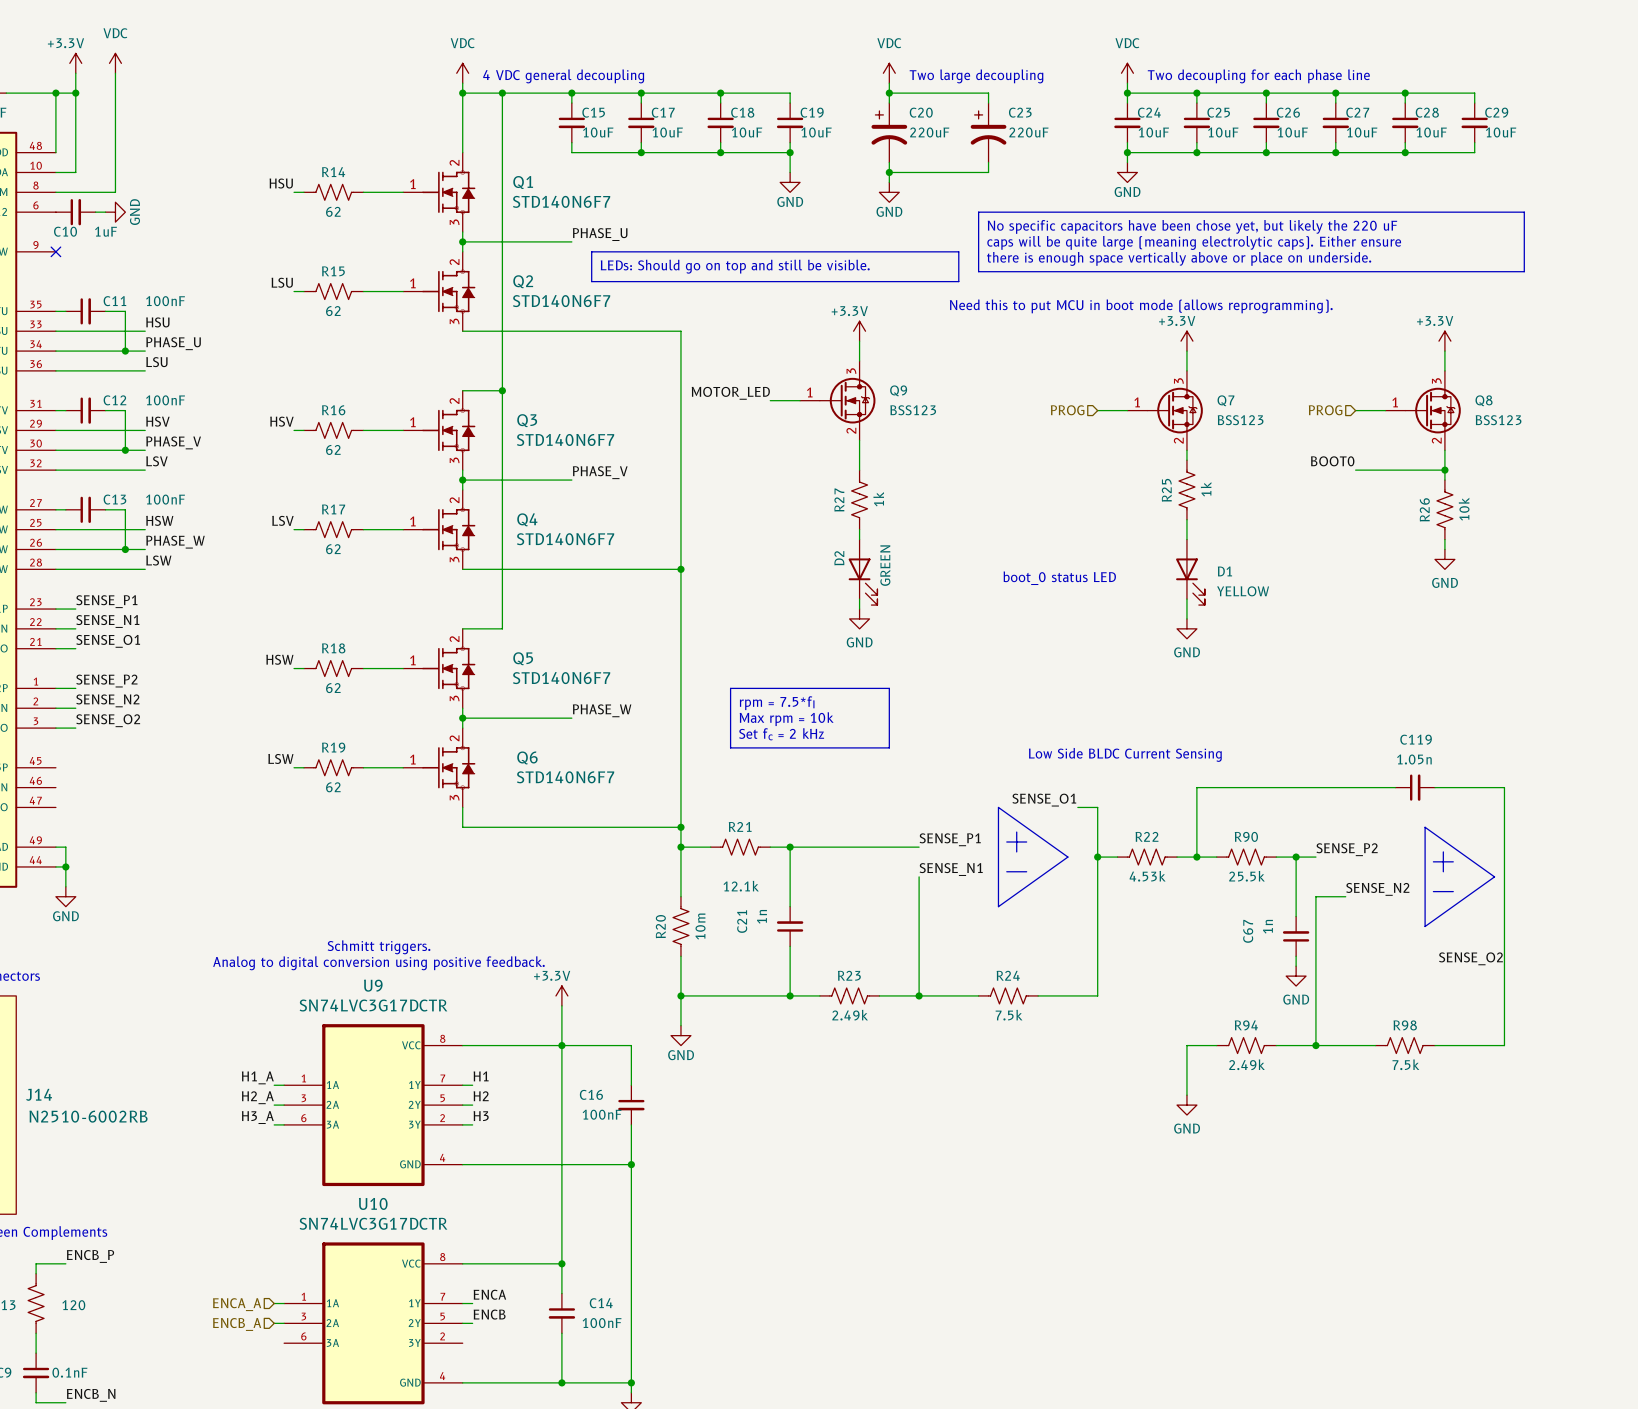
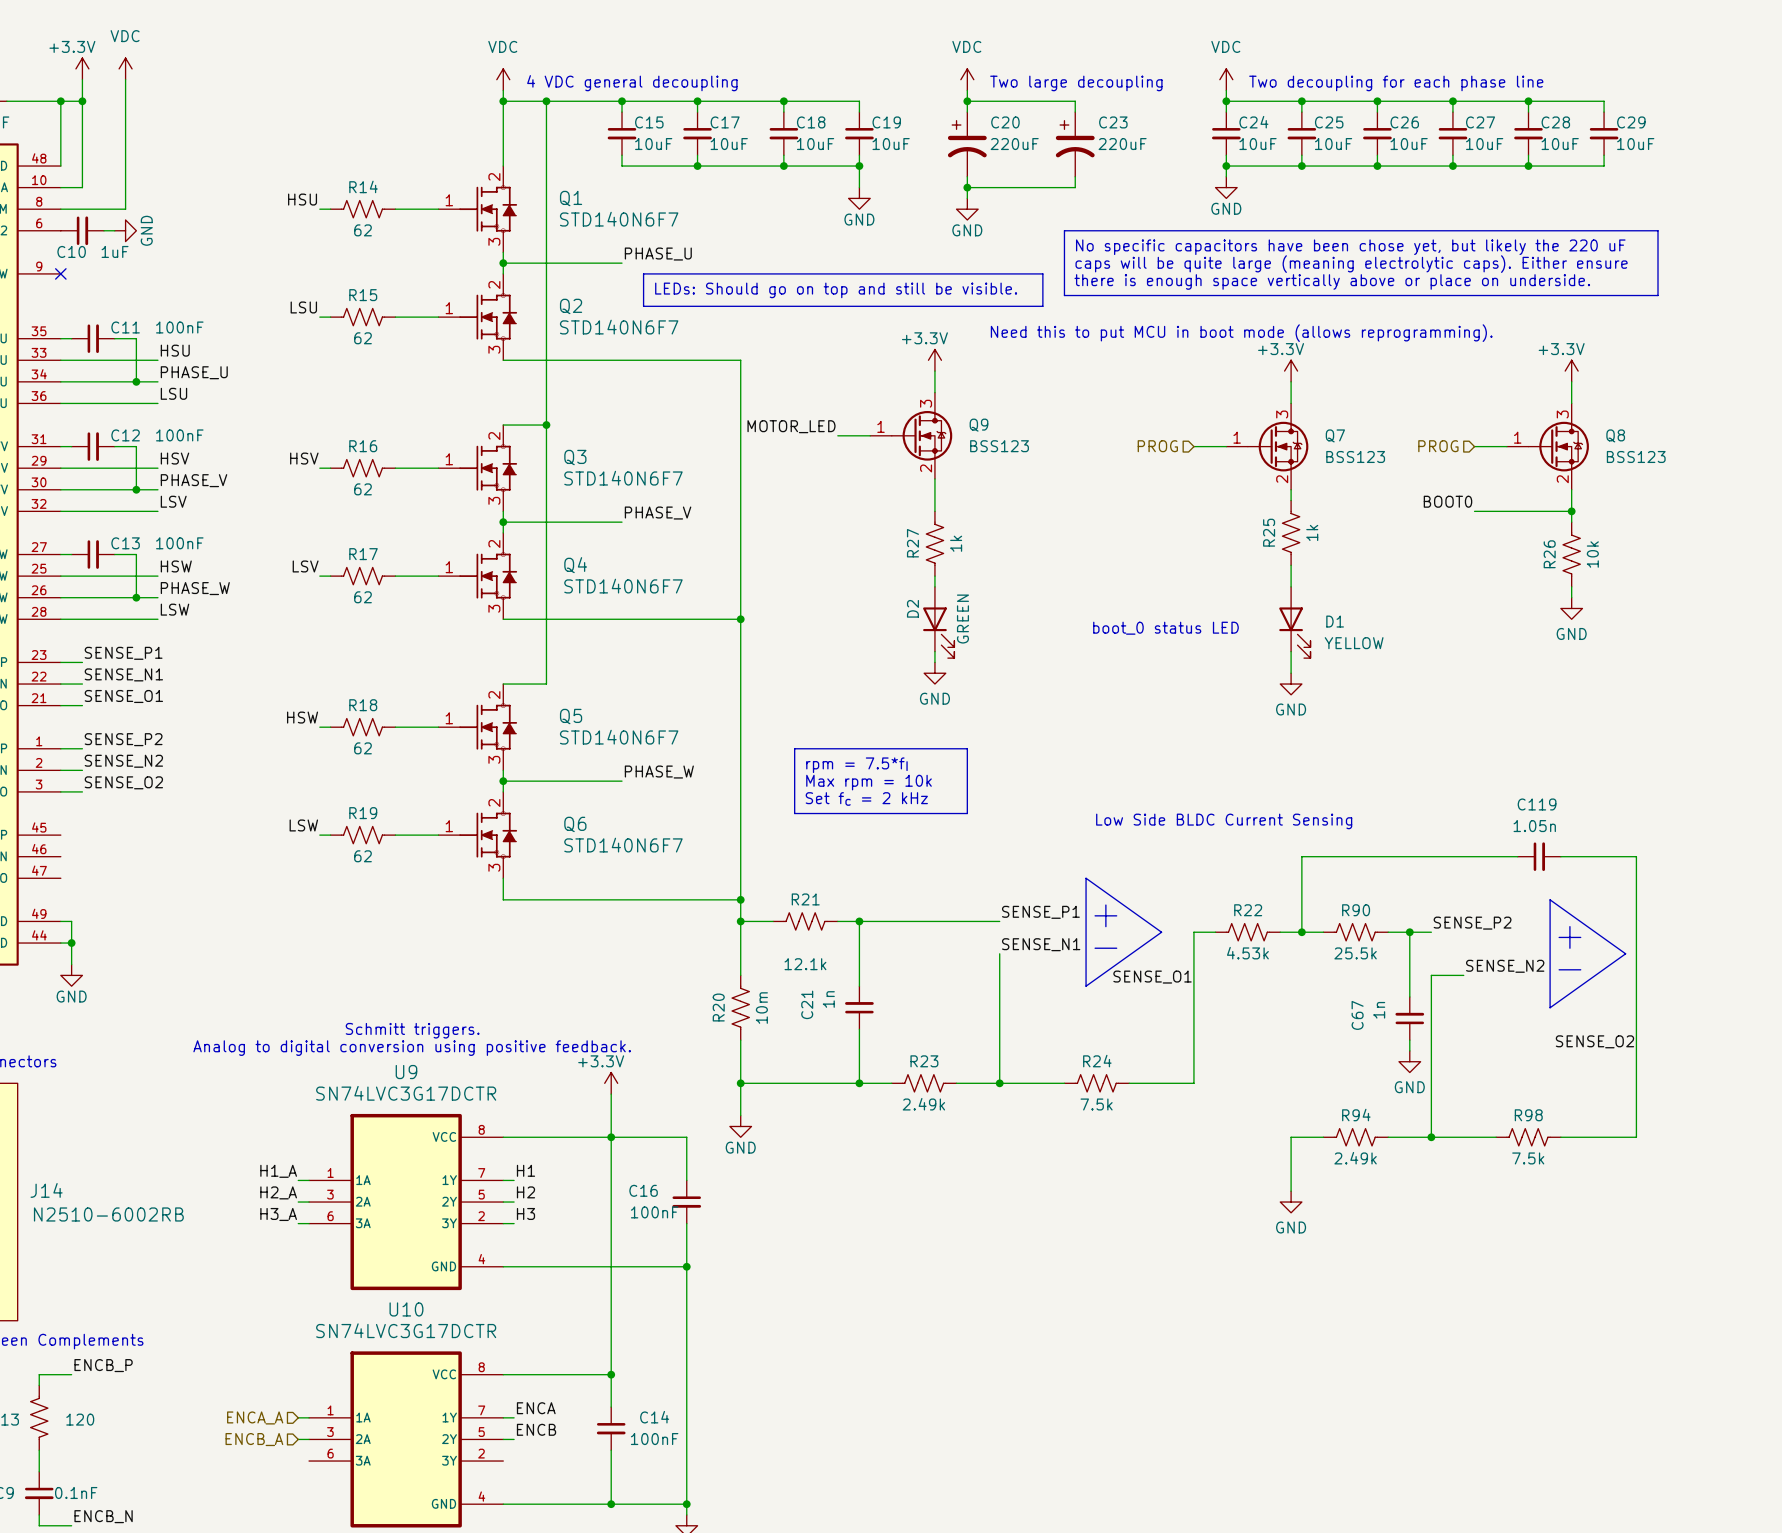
label position: SENSE_O1 (1044, 800) -> SENSE_O1 (1152, 977)
wire: (1077, 807) (1097, 807) (1097, 857) -> none
junction: (1097, 857) -> none

